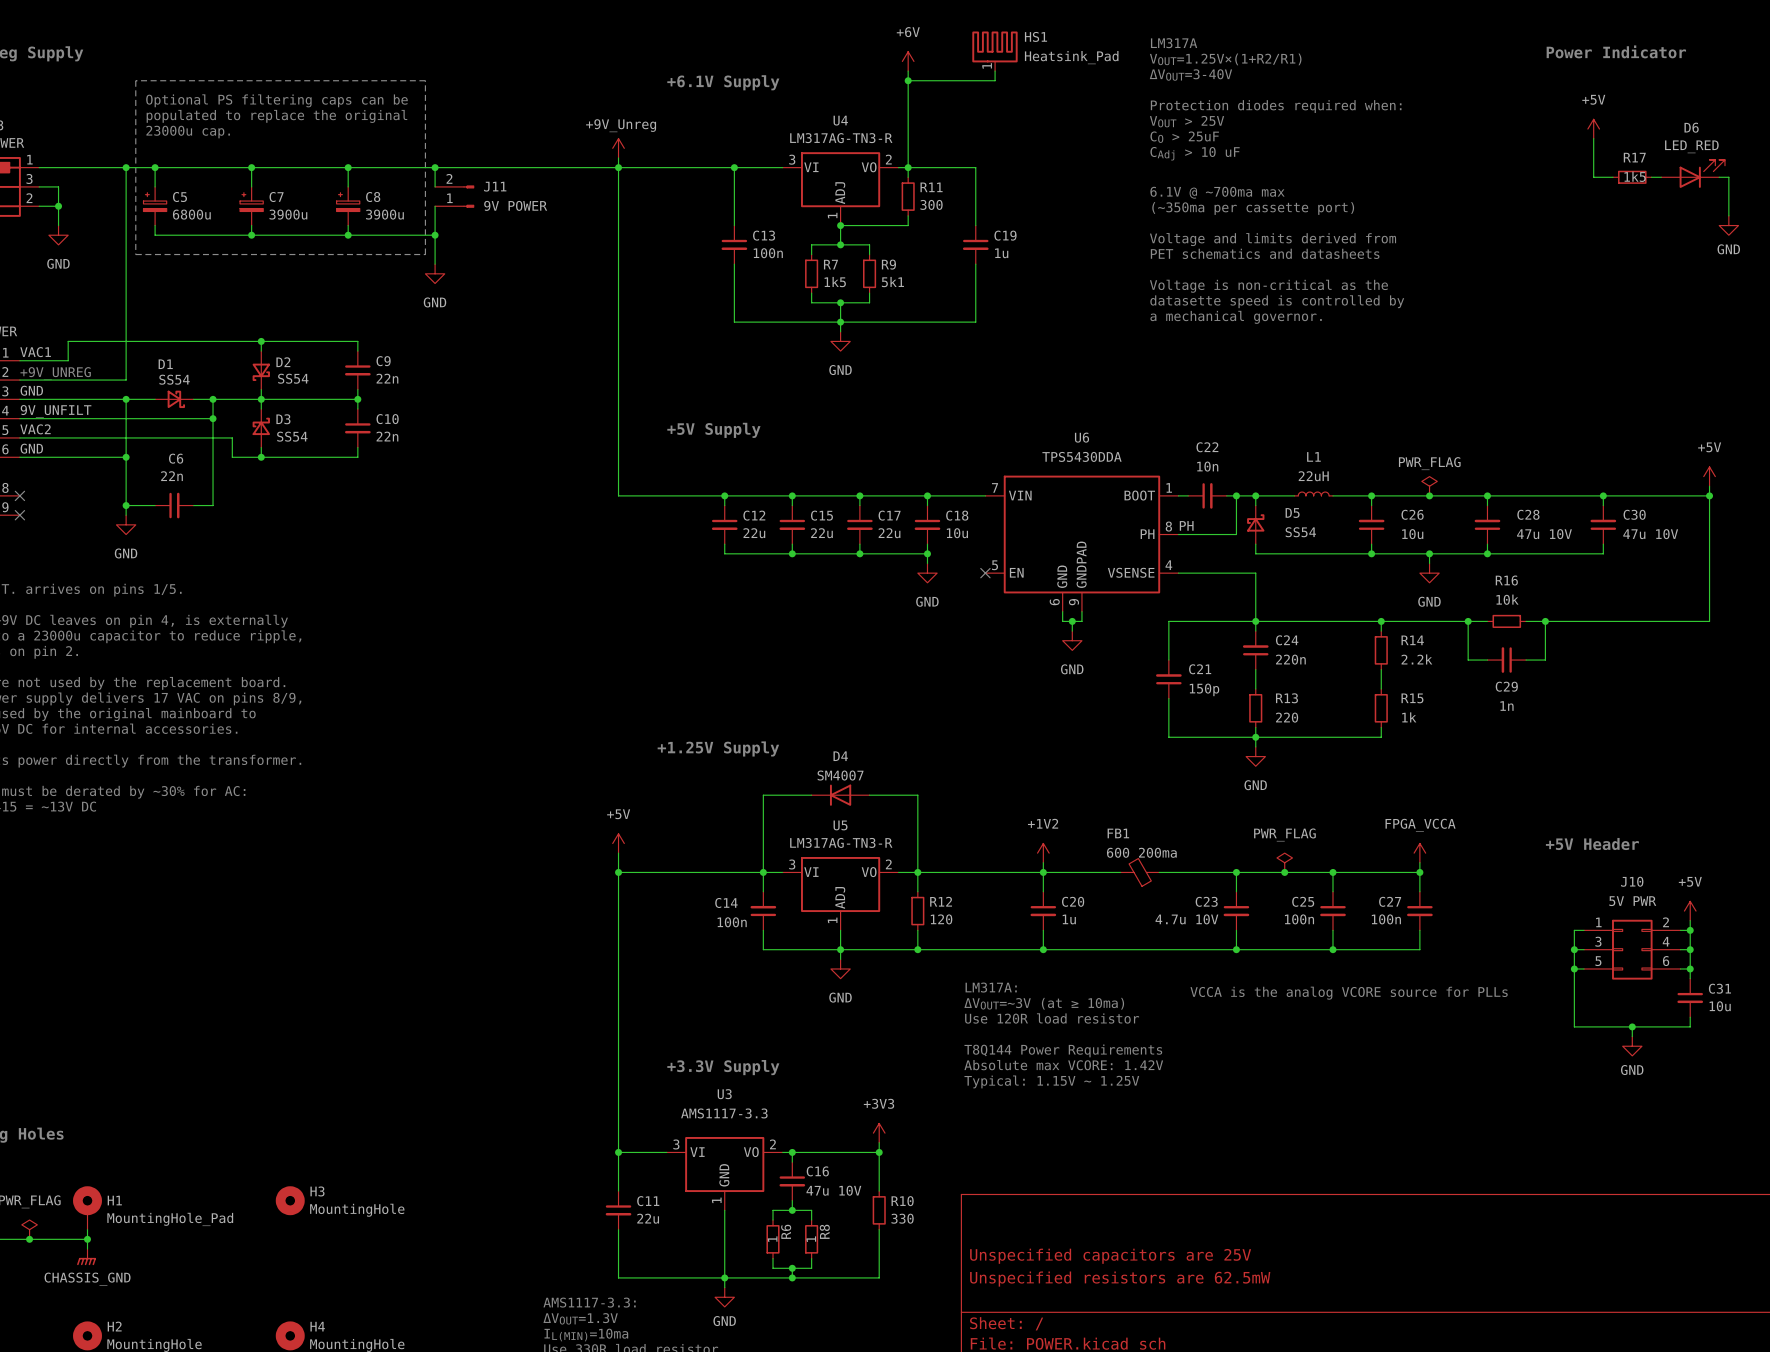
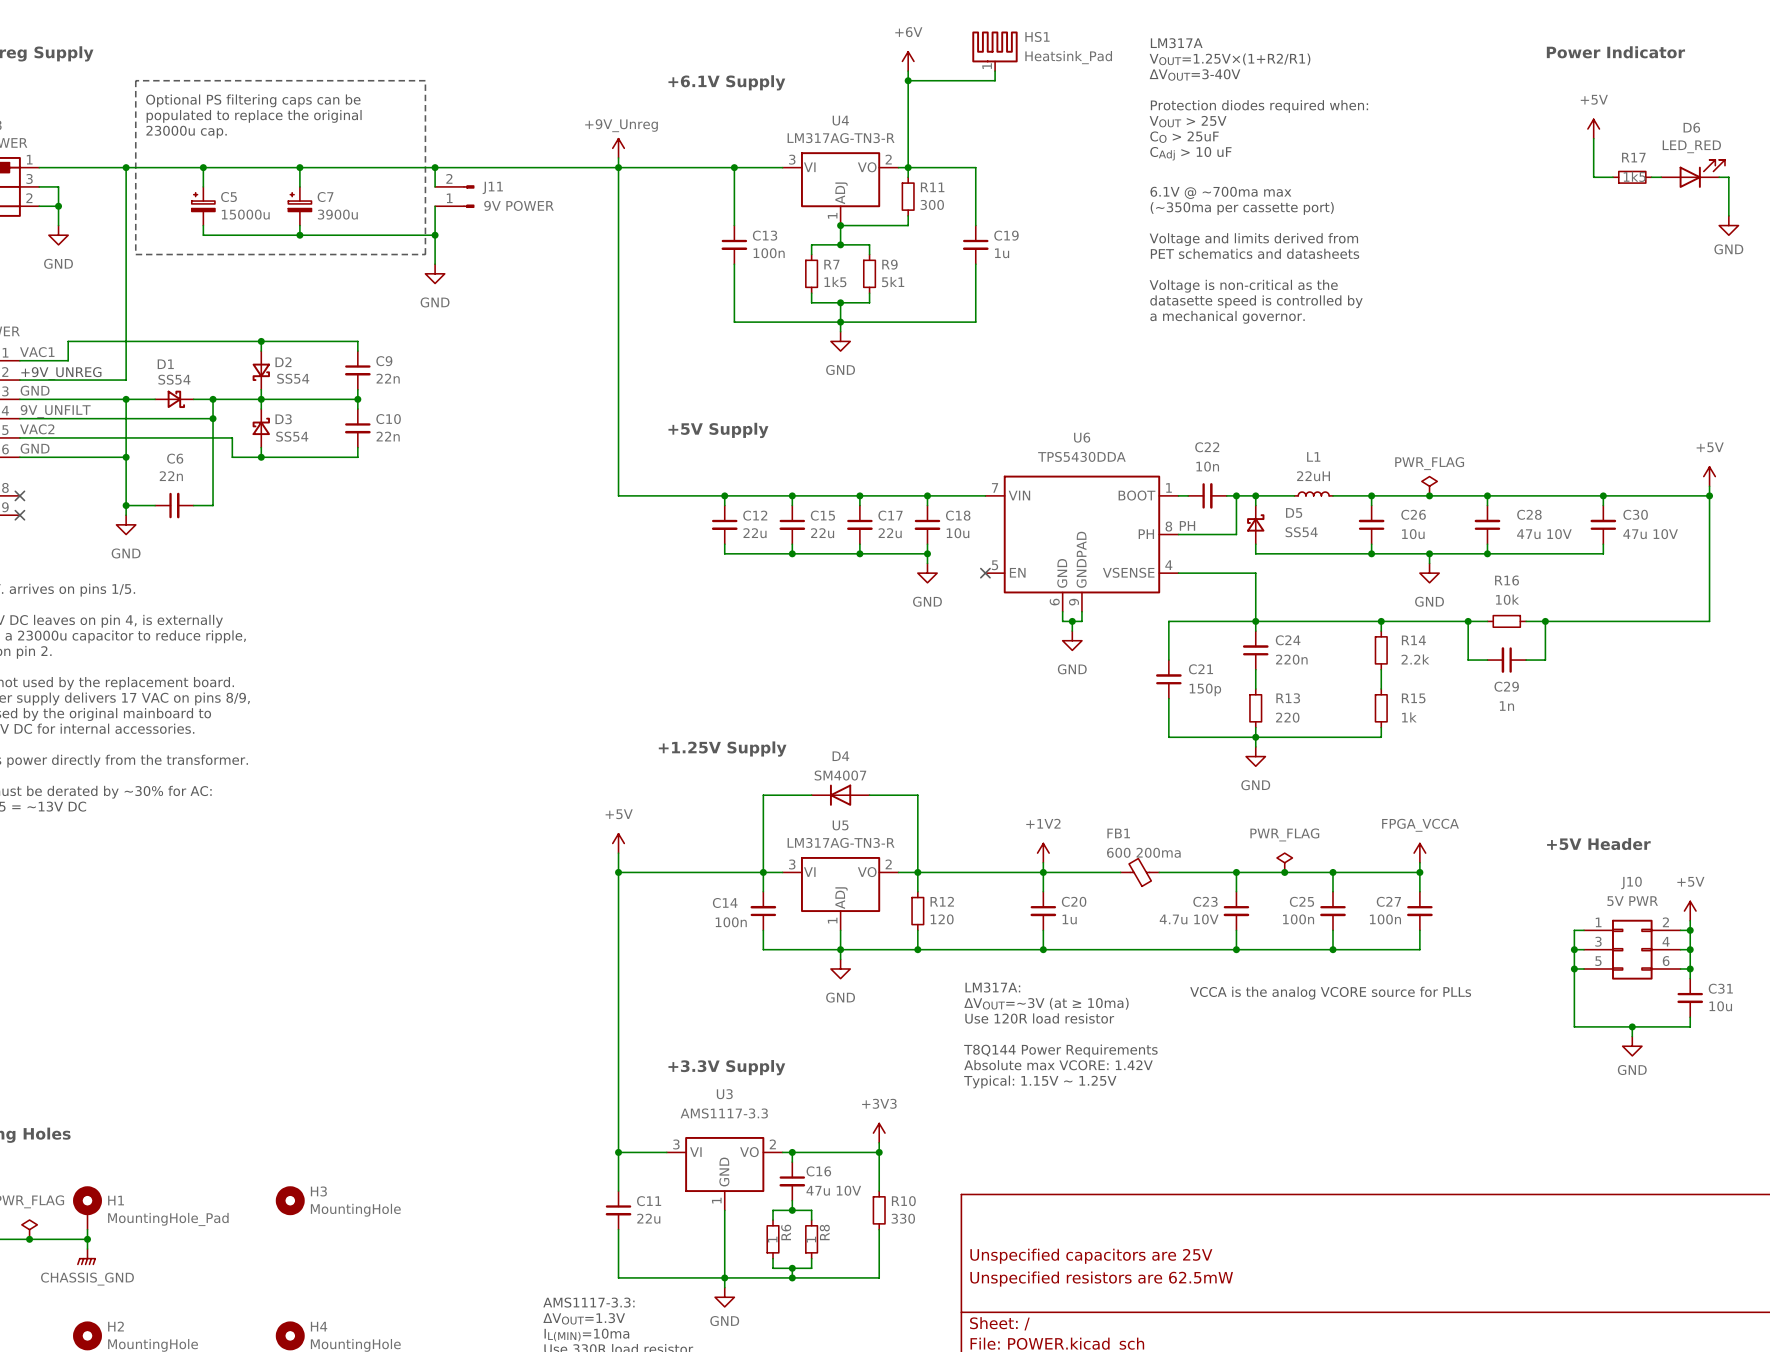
wire: (155, 167) (155, 186) -> none
junction: (155, 167) -> none
junction: none -> (203, 167)
wire: (251, 167) (251, 186) -> (203, 167) (203, 186)
junction: (251, 167) -> none
junction: none -> (299, 167)
wire: (348, 167) (348, 186) -> (299, 167) (299, 186)
junction: (348, 167) -> none
C5 position: (155, 206) -> (203, 206)
C7 position: (251, 206) -> (299, 206)
C8: 3900u (348, 206) -> none
C5 value: 6800u (191, 214) -> 15000u (245, 214)
wire: (155, 225) (155, 235) (203, 235) -> (203, 225) (203, 235)
wire: (251, 225) (251, 235) -> none
wire: (348, 225) (348, 235) -> (299, 225) (299, 235)
junction: (251, 235) -> none
junction: none -> (299, 235)
junction: (348, 235) -> none

